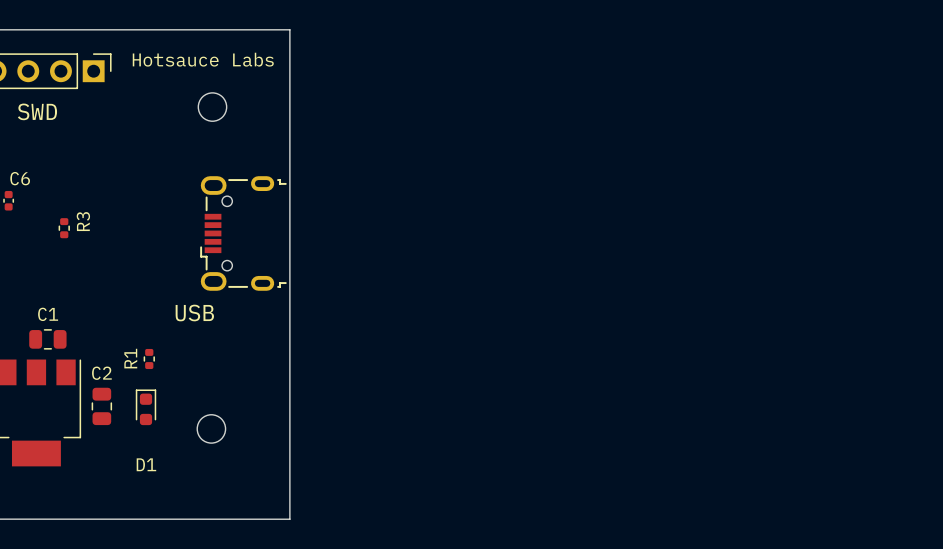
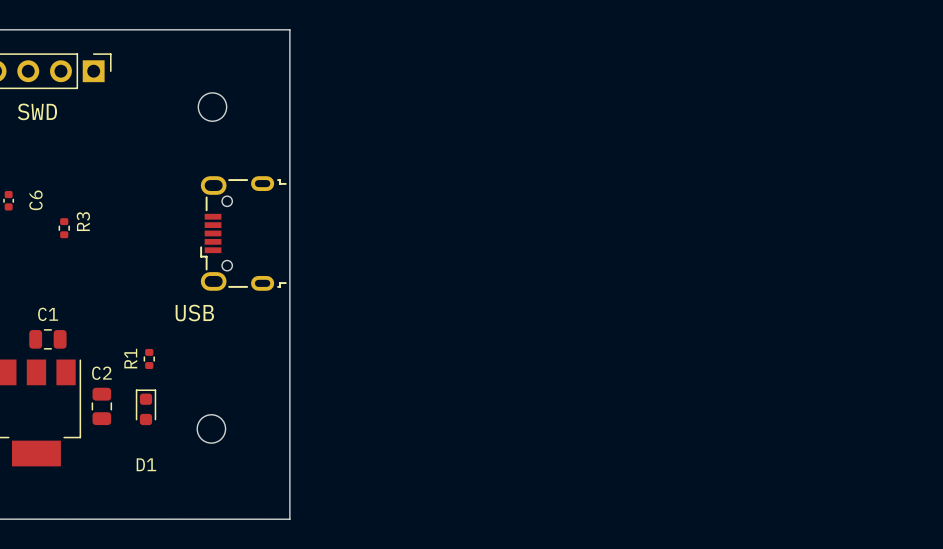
text: Hotsauce Labs (203, 59) -> none
C6 name rotation: 0° (20, 178) -> 90° counterclockwise (35, 200)

